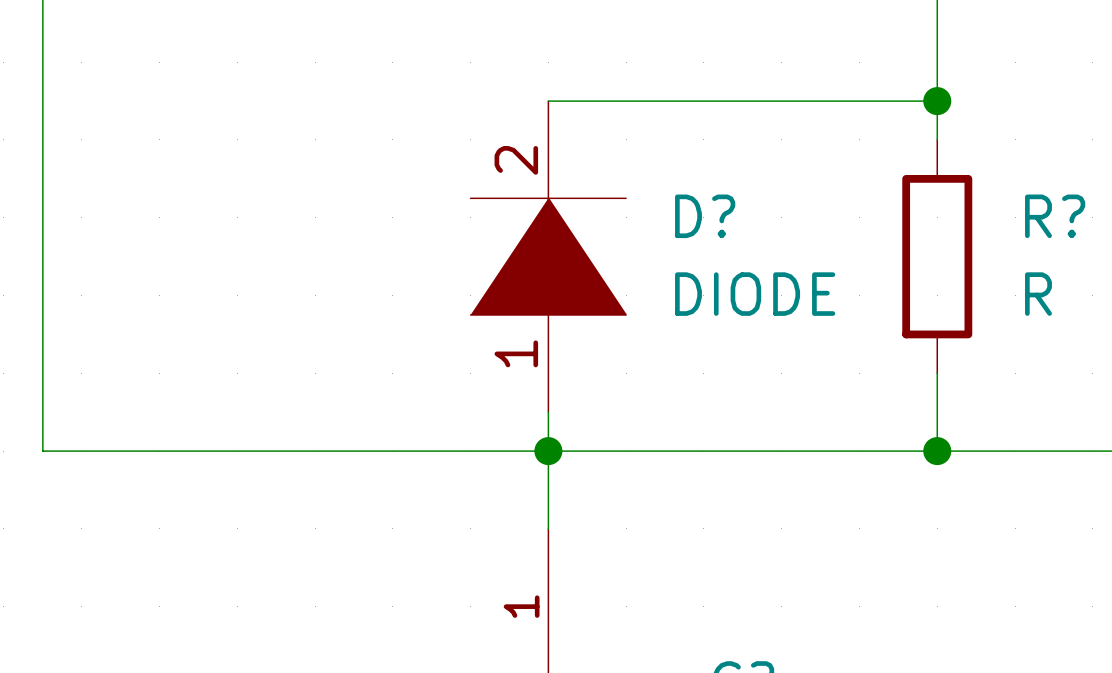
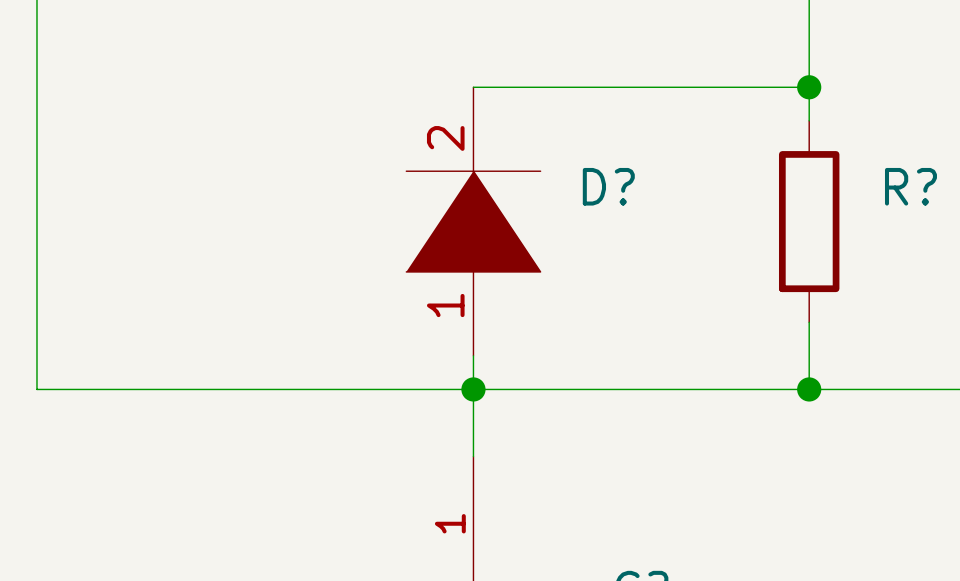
D? value: DIODE (755, 294) -> none
R? value: R (1038, 294) -> none

